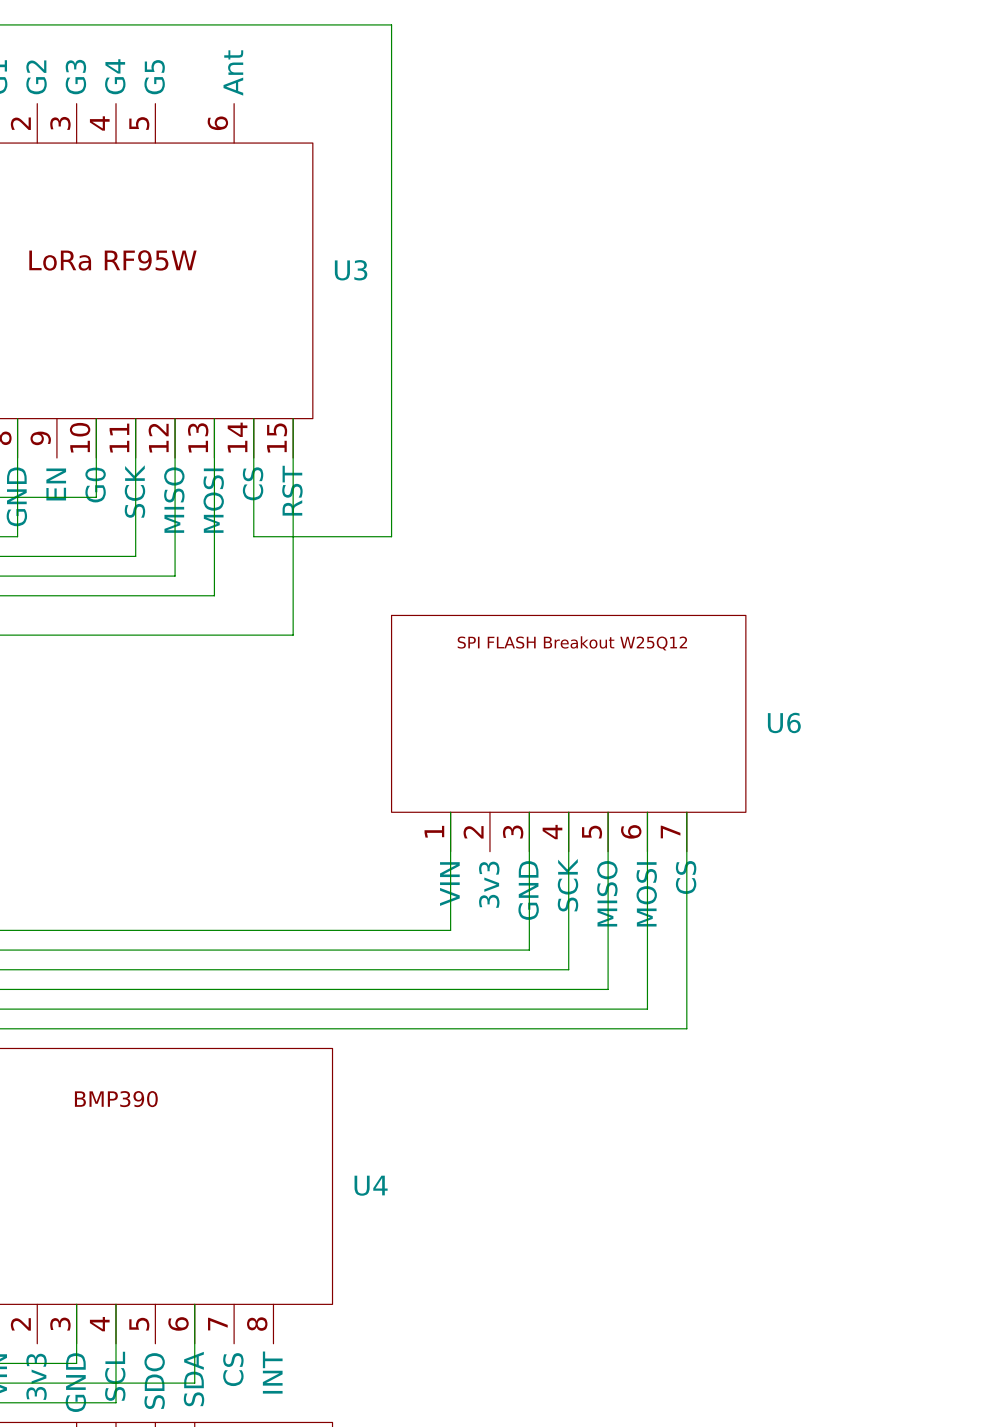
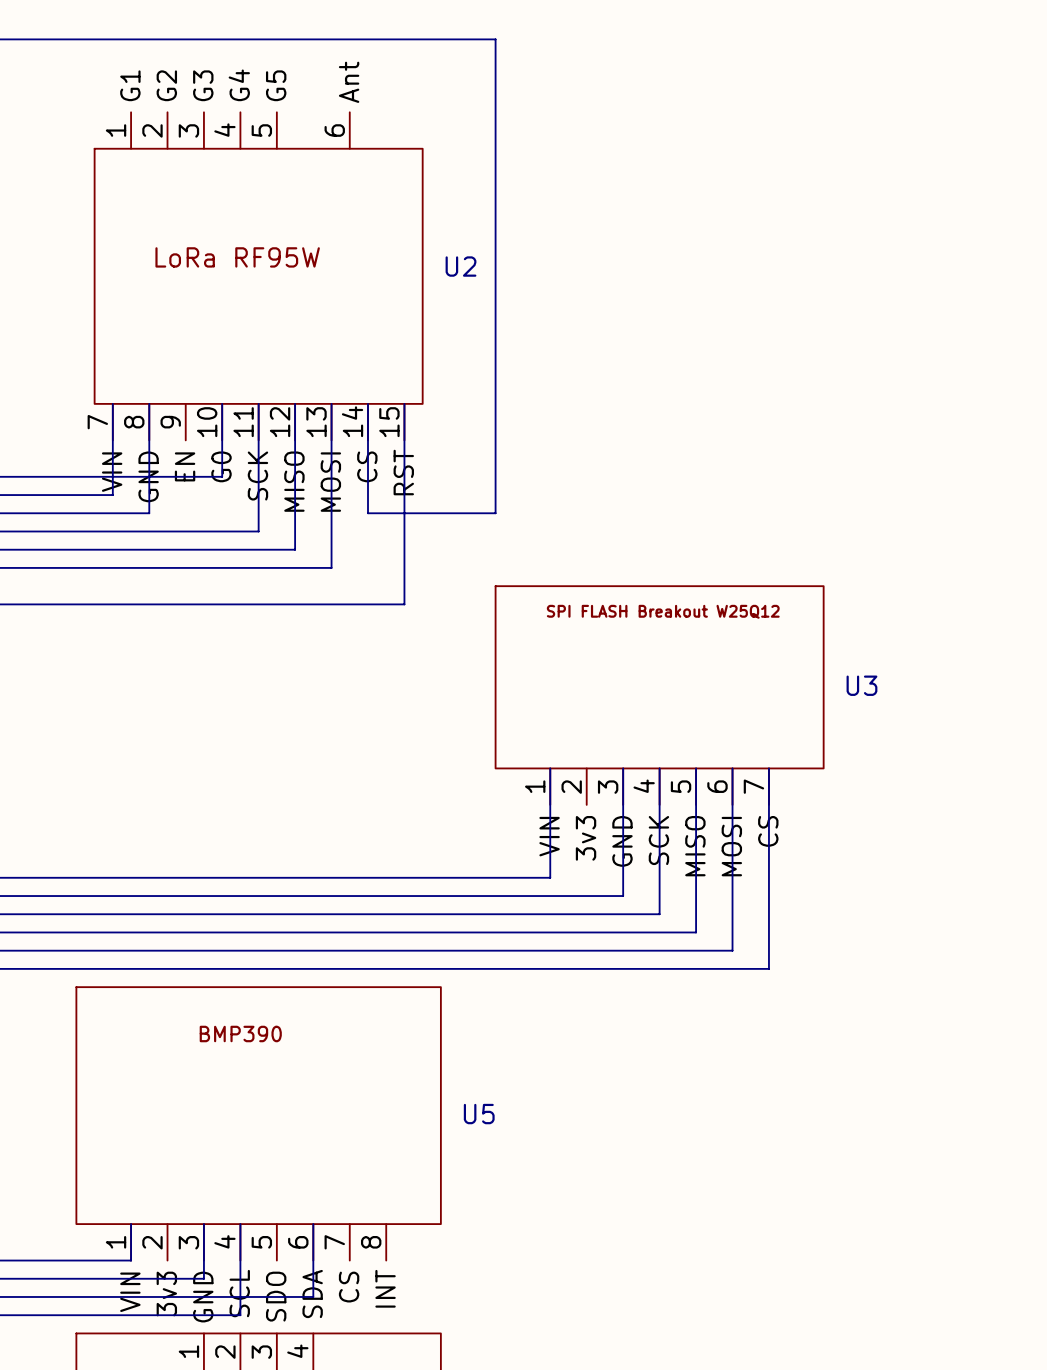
U3 name: U3 (351, 270) -> U2 (461, 266)
U6 name: U6 (784, 722) -> U3 (861, 685)
U4 name: U4 (371, 1185) -> U5 (479, 1114)

